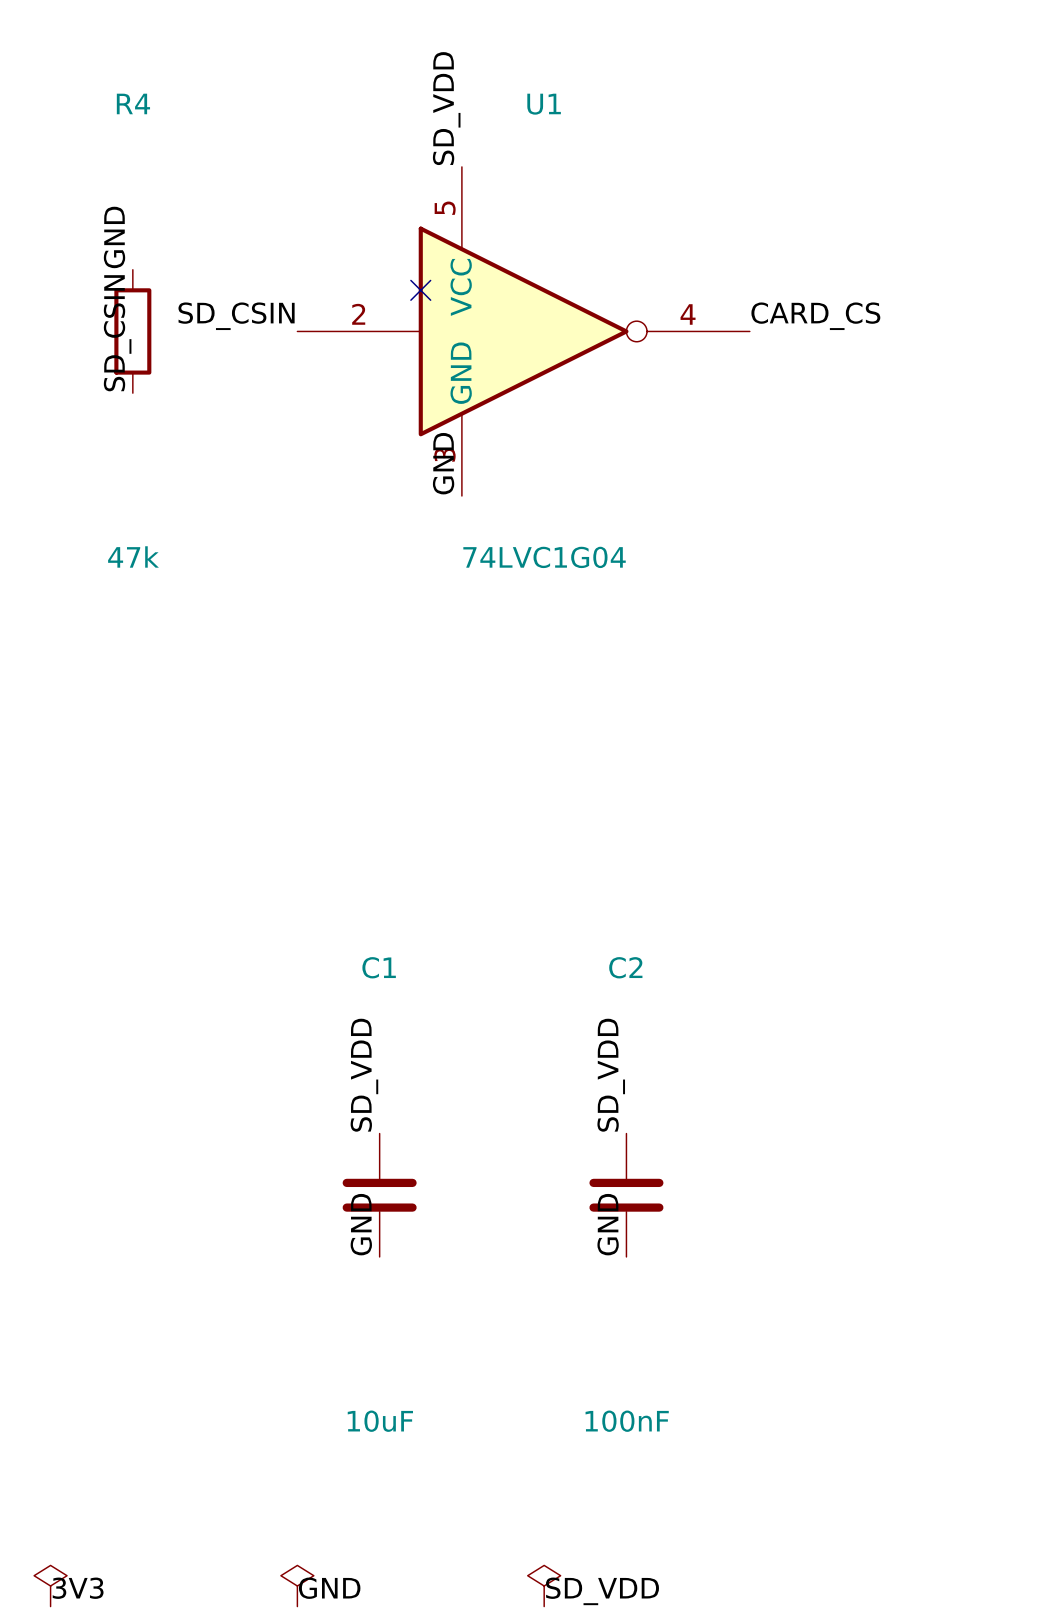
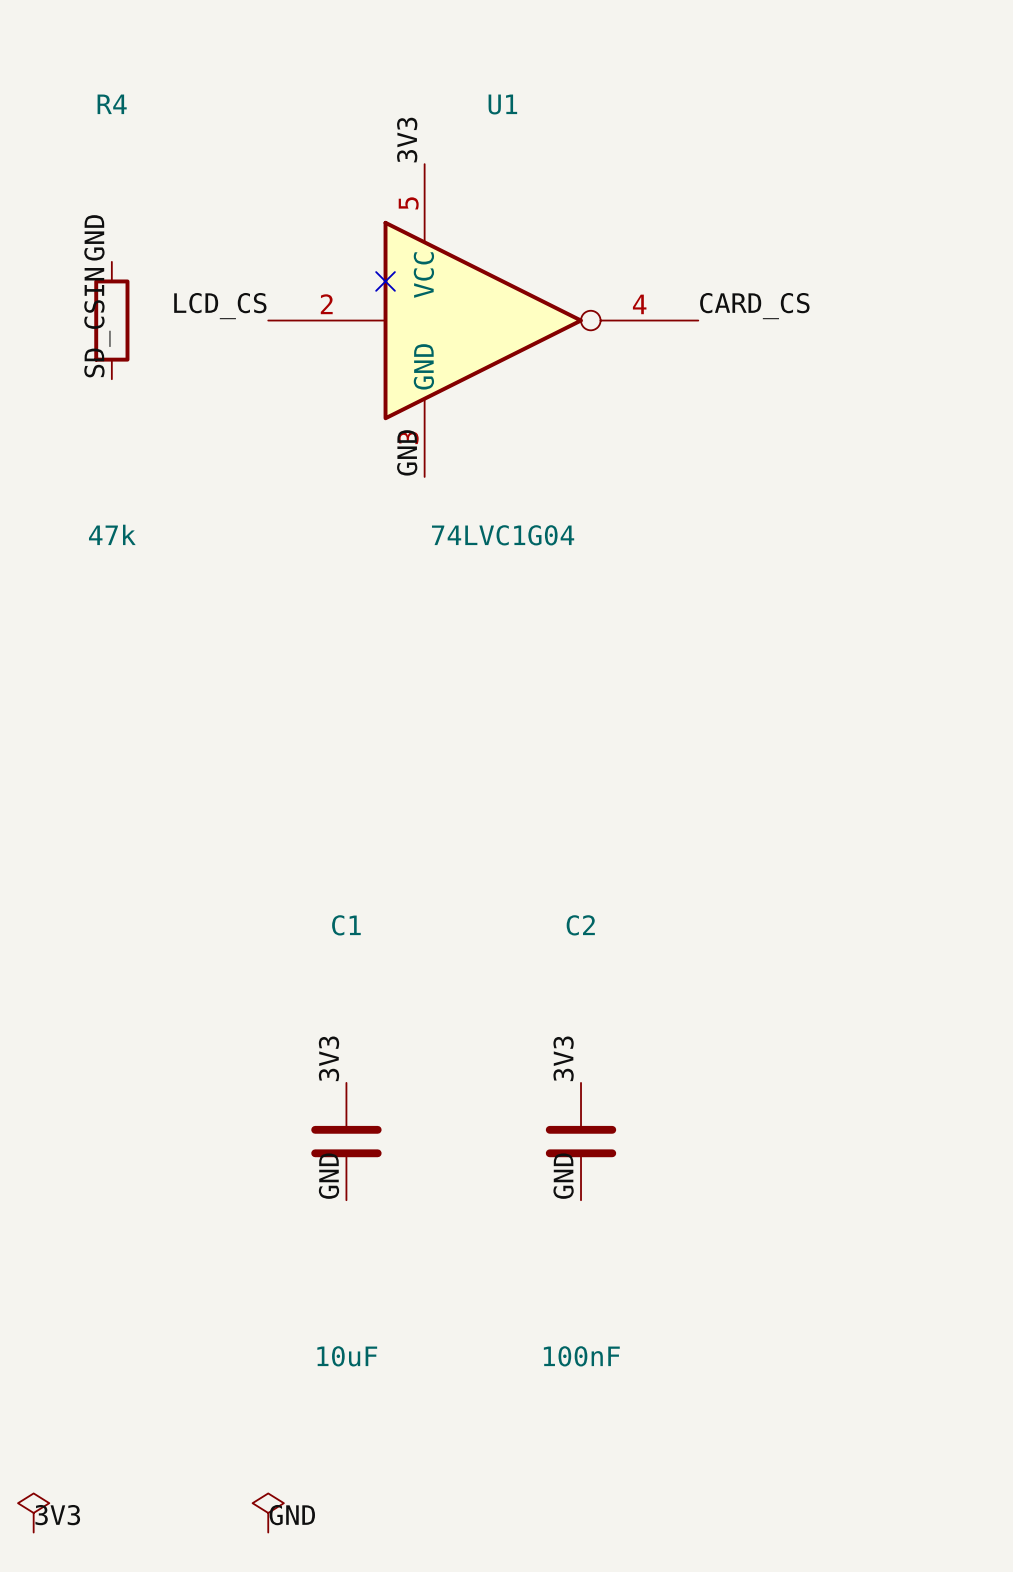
label: SD_VDD (446, 108) -> 3V3 (407, 140)
label: SD_CSIN (236, 316) -> LCD_CS (220, 306)
label: SD_VDD (364, 1075) -> 3V3 (329, 1058)
label: SD_VDD (611, 1075) -> 3V3 (563, 1058)
power symbol: (544, 1586) -> none
label: SD_VDD (602, 1591) -> none

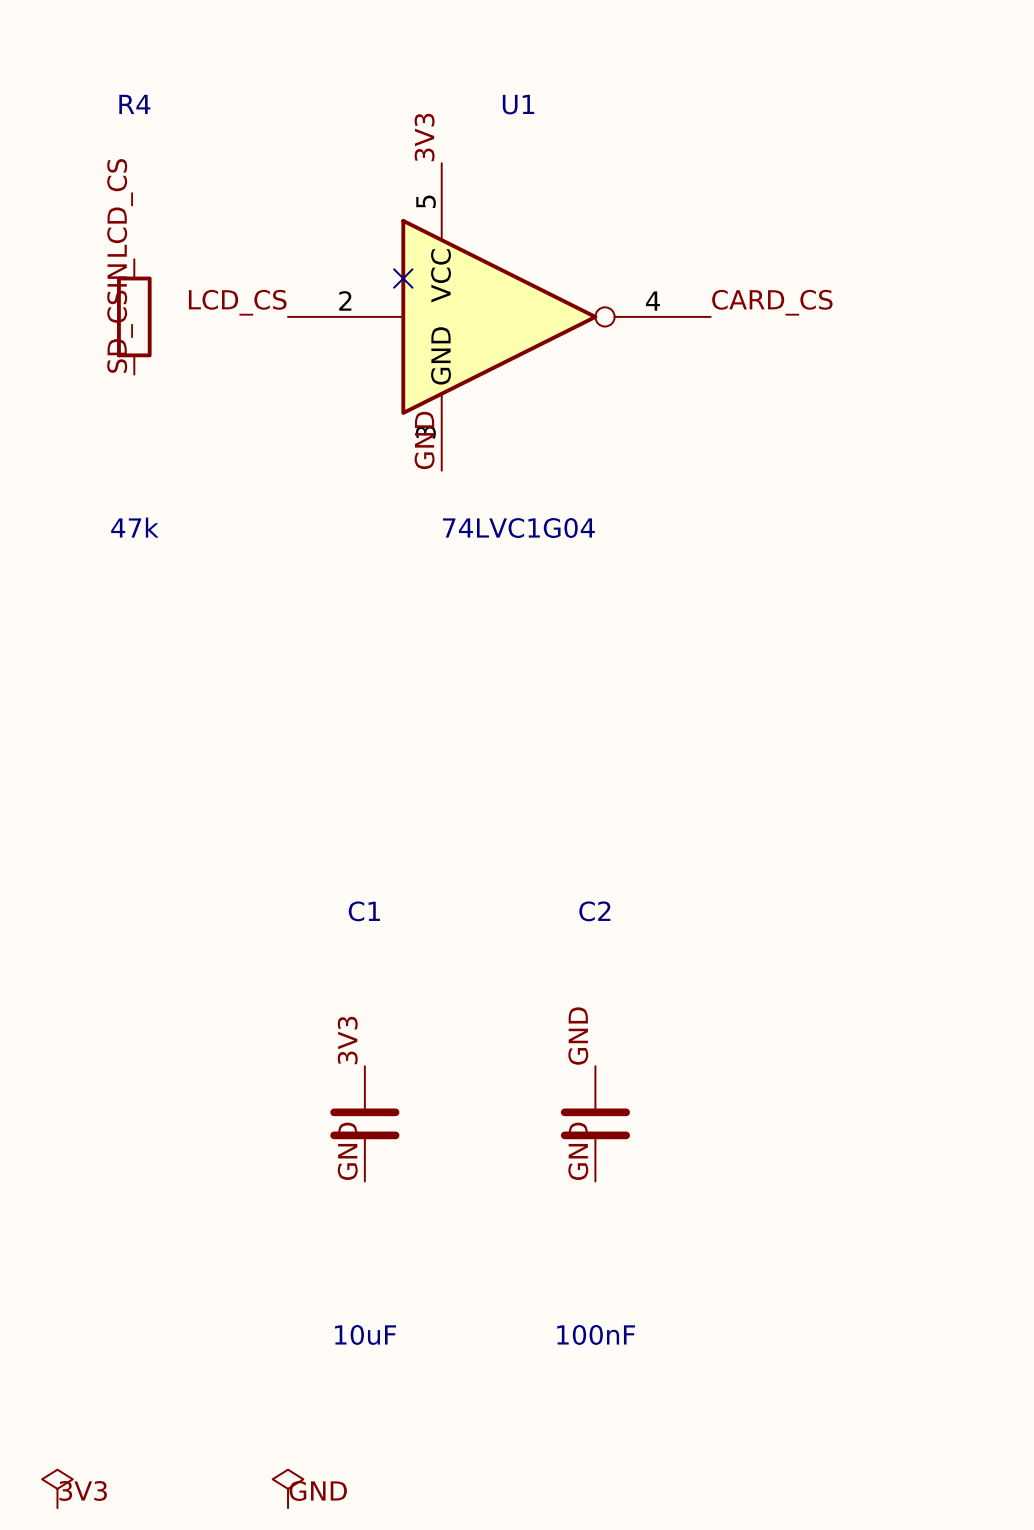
label: GND (94, 237) -> LCD_CS (120, 207)
label: 3V3 (563, 1058) -> GND (578, 1036)

